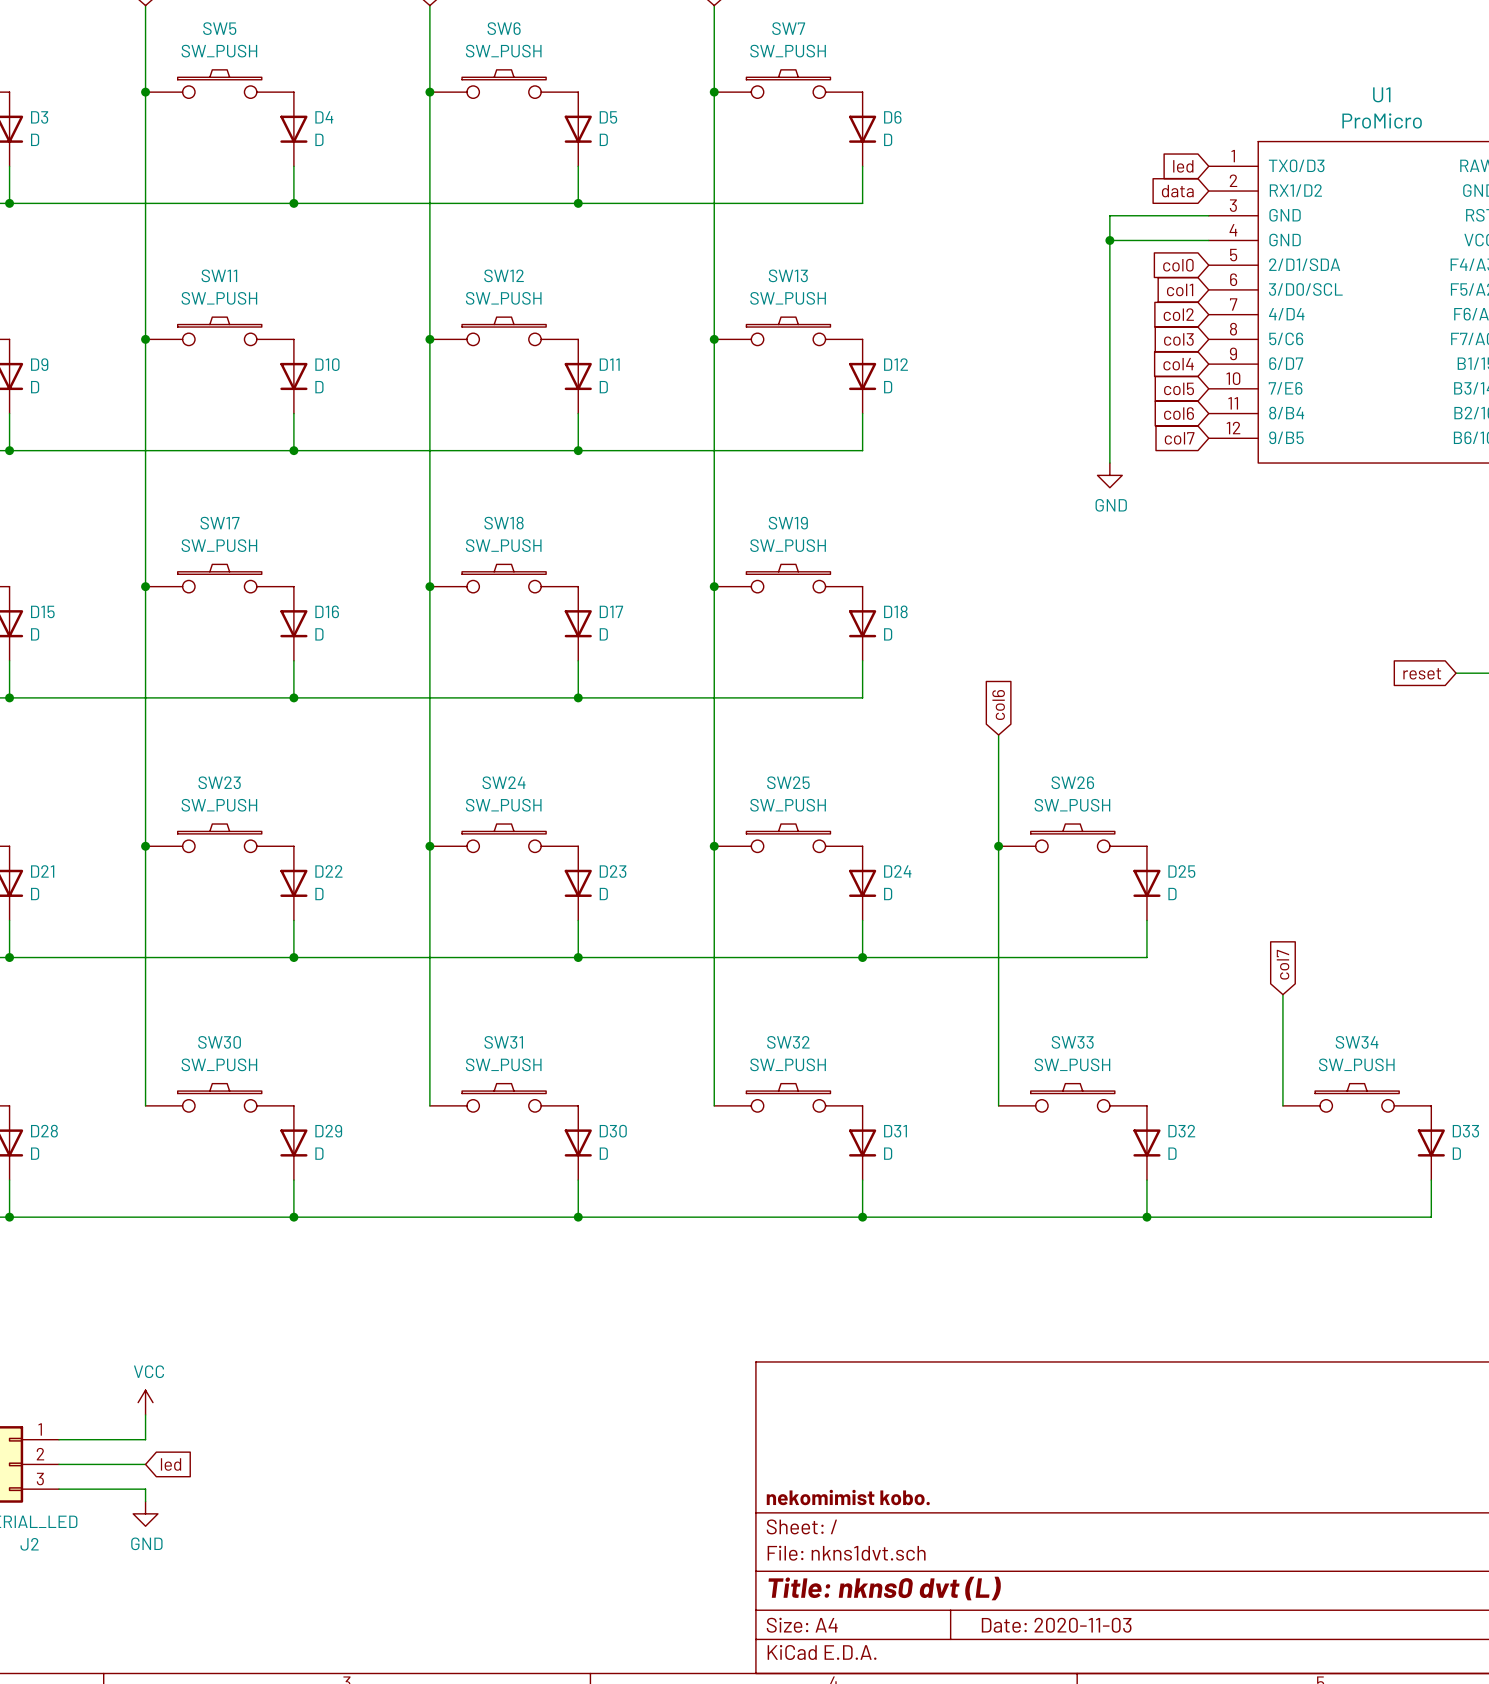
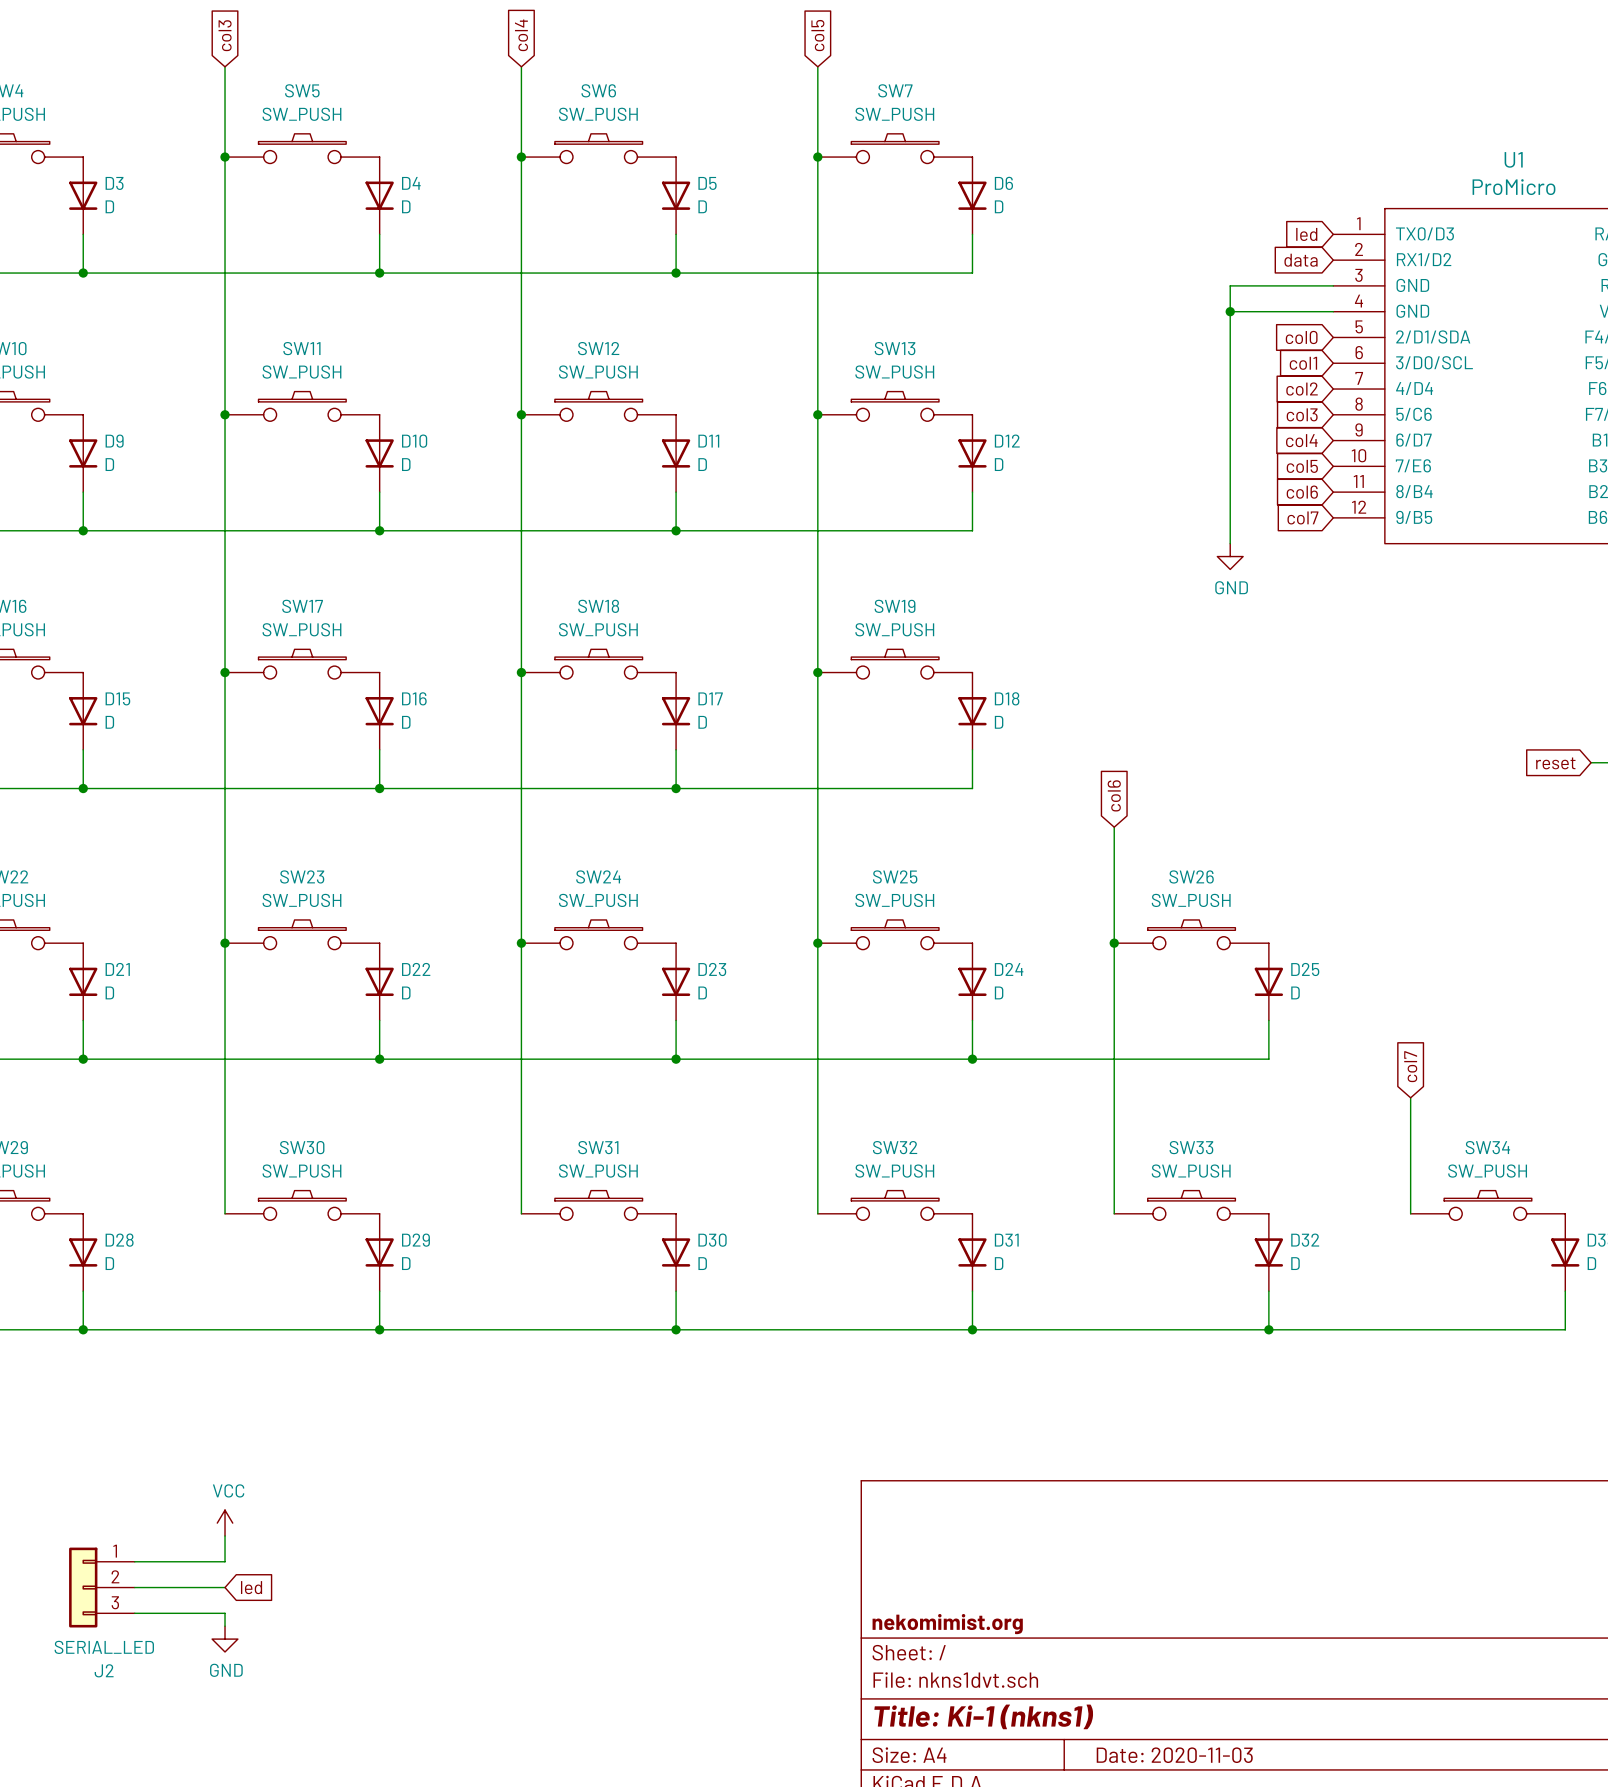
title block: nekomimist kobo. (848, 1497) -> nekomimist.org (947, 1624)
title block: Title: nkns0 dvt (L) (884, 1588) -> Title: Ki-1 (nkns1) (983, 1716)

